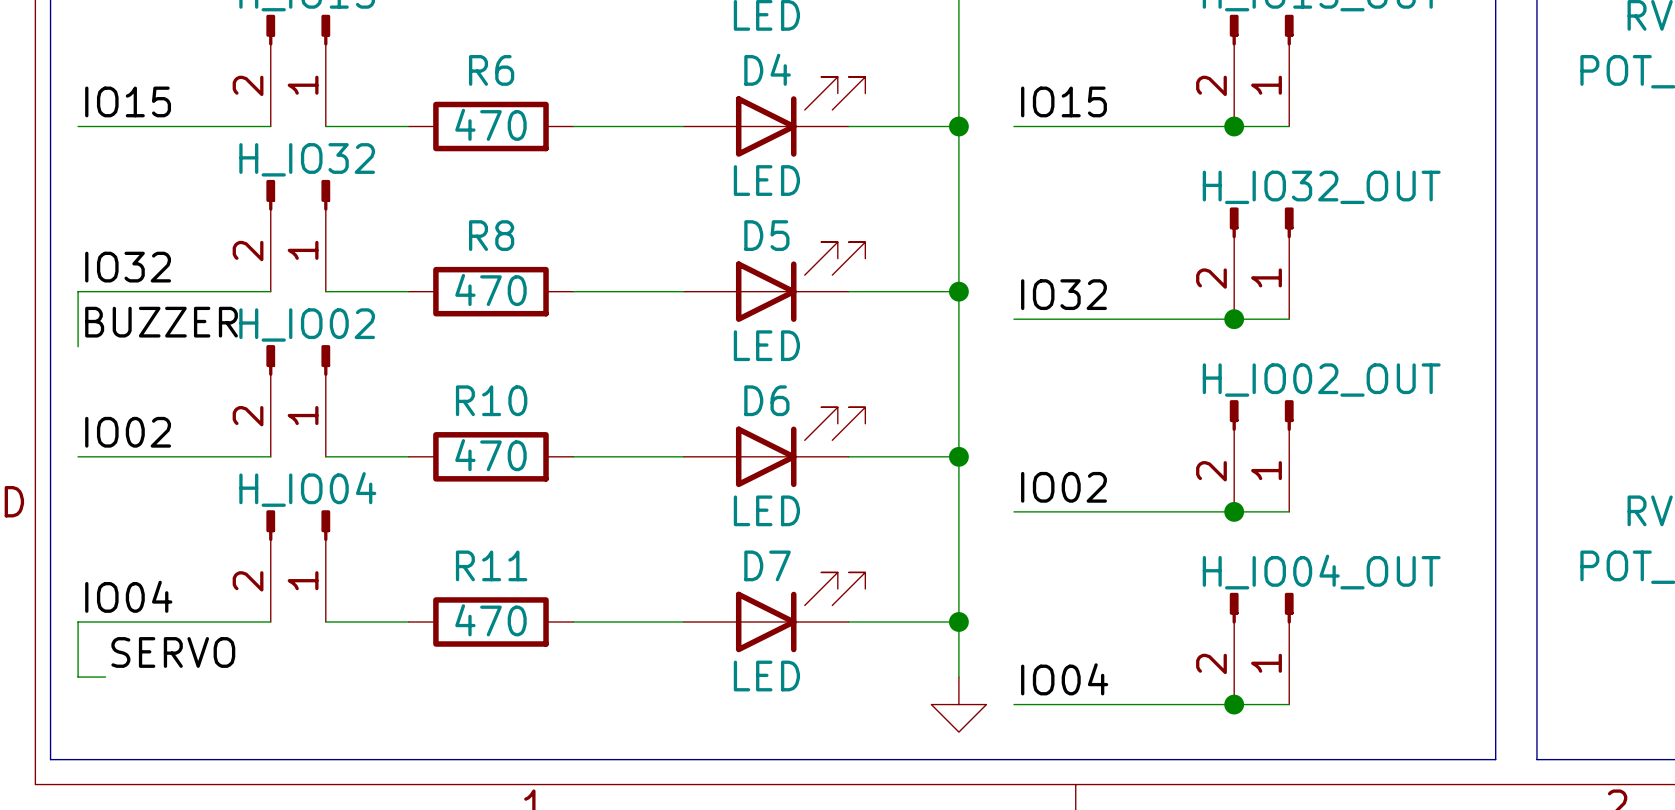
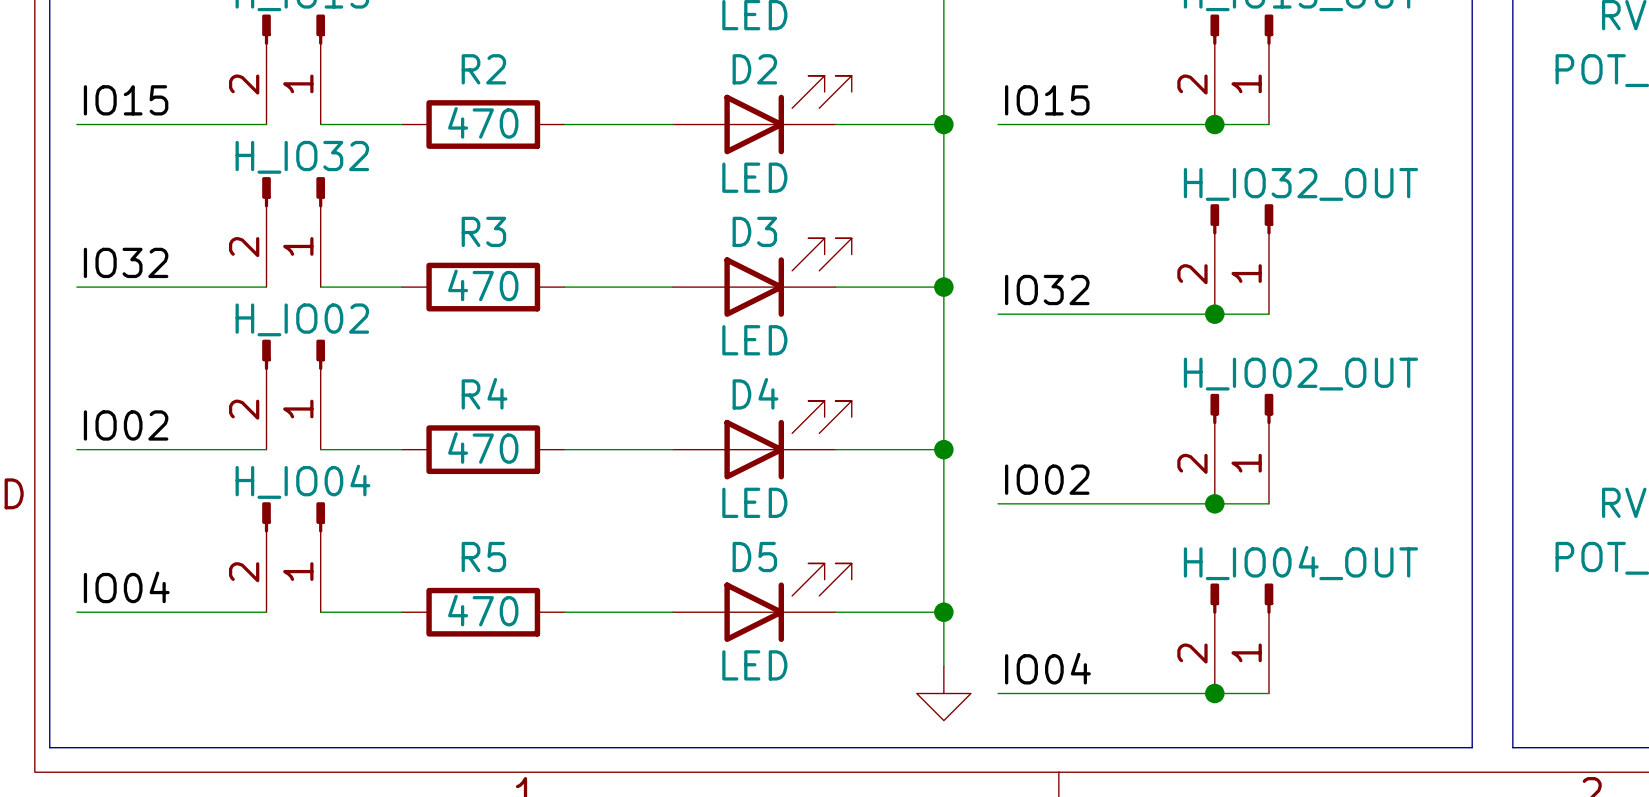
D4 name: D4 (767, 69) -> D2 (754, 69)
R6 name: R6 (491, 70) -> R2 (483, 69)
R8 name: R8 (491, 235) -> R3 (483, 231)
D5 name: D5 (766, 235) -> D3 (754, 231)
wire: (78, 291) (78, 346) -> none
label: BUZZER (161, 322) -> none
R10 name: R10 (491, 400) -> R4 (484, 393)
D6 name: D6 (766, 400) -> D4 (755, 393)
R11 name: R11 (491, 565) -> R5 (483, 557)
D7 name: D7 (767, 565) -> D5 (754, 557)
wire: (78, 621) (78, 677) (105, 677) -> none
label: SERVO (173, 652) -> none

